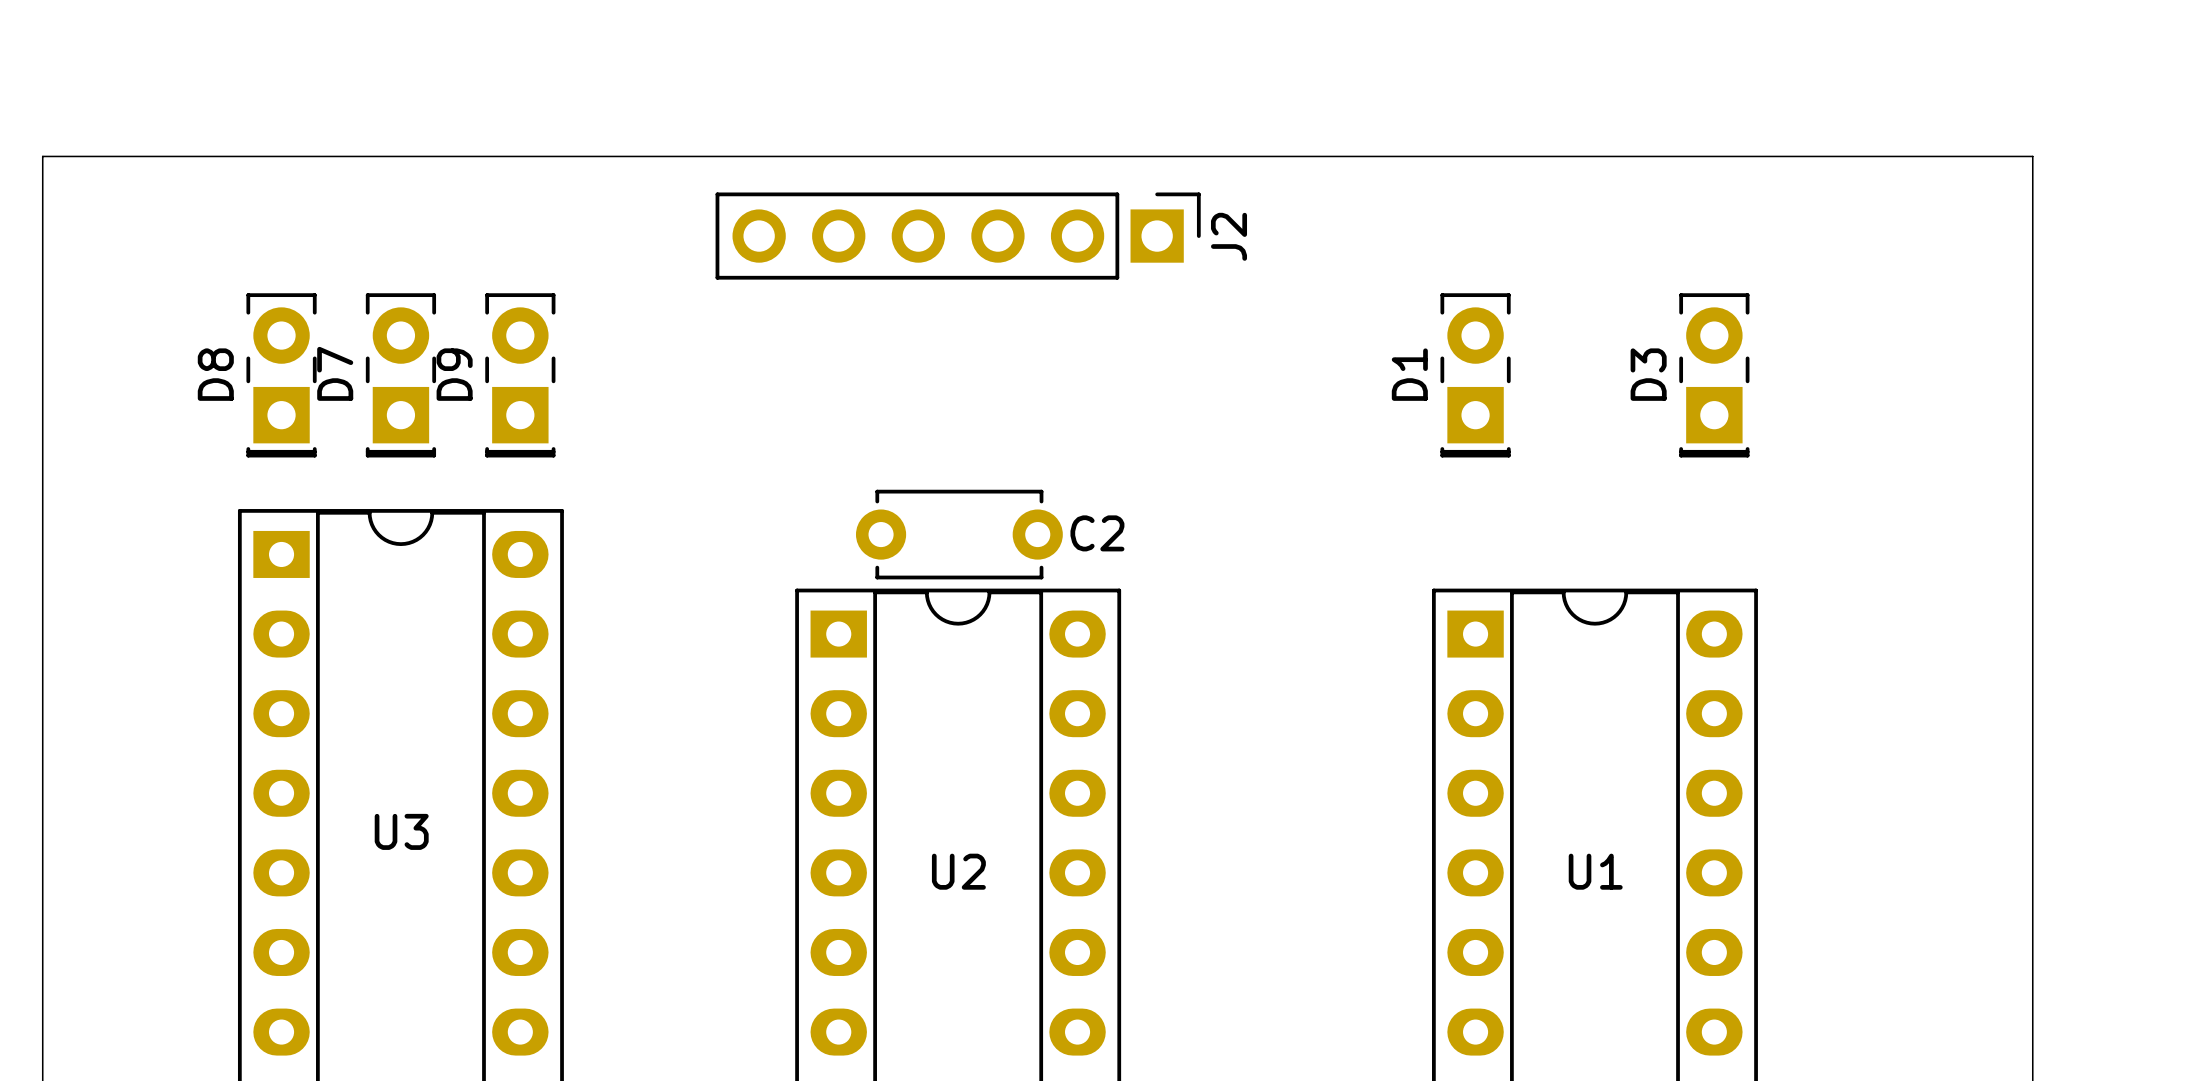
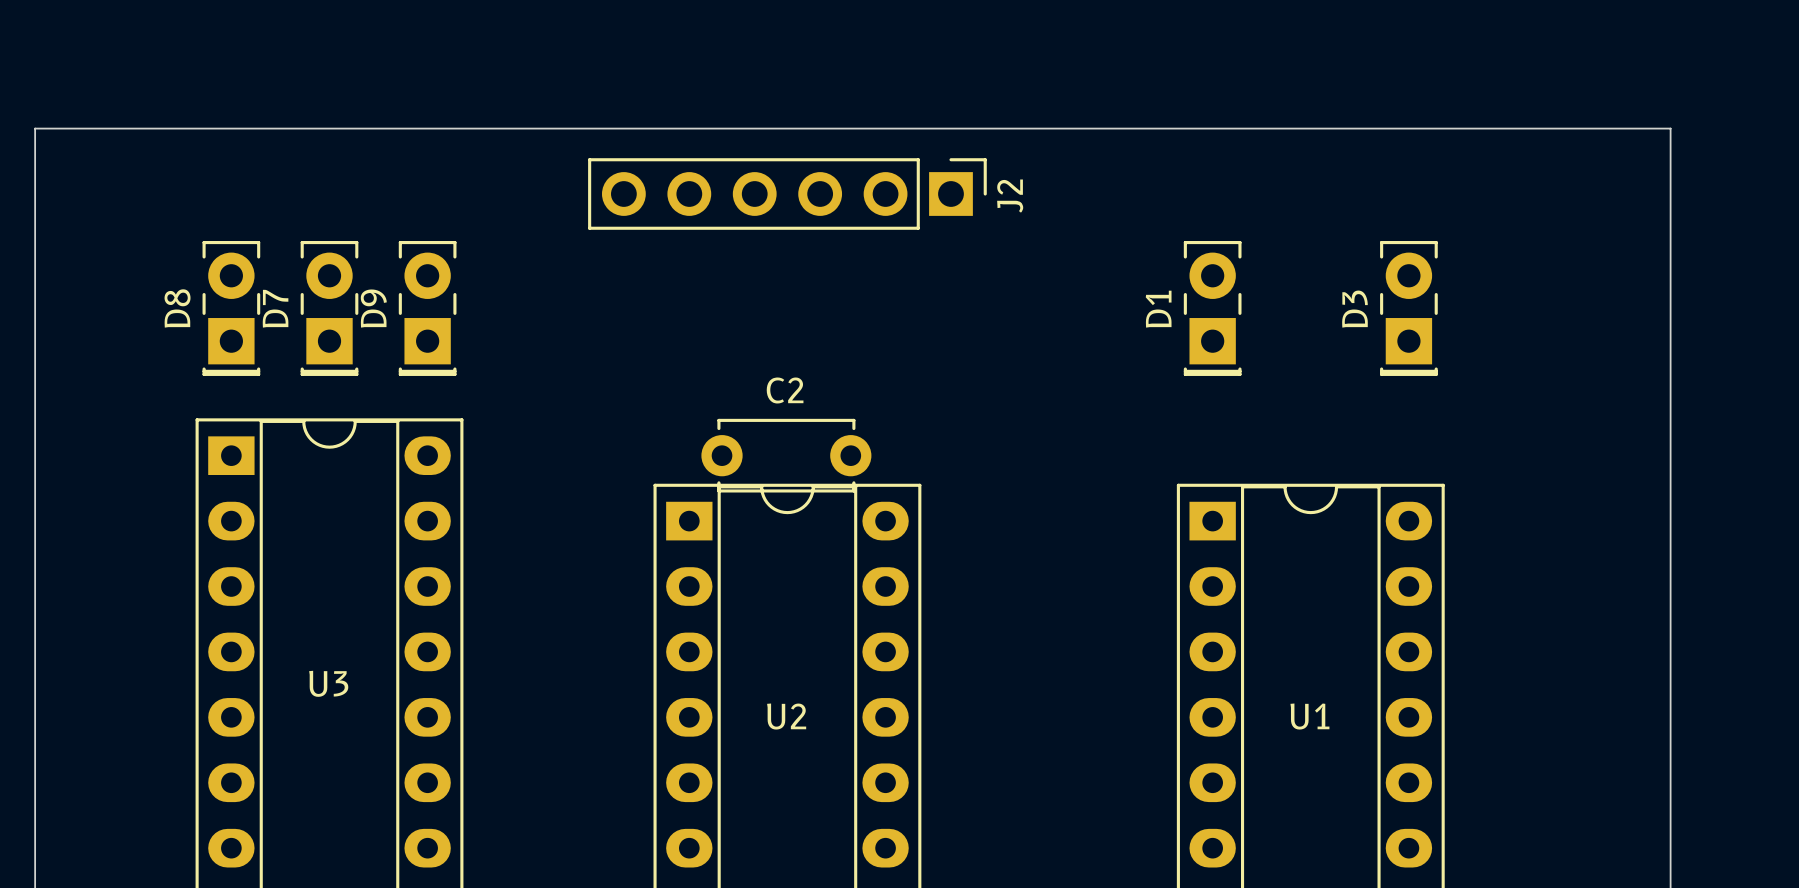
C2 name position: C2 (1097, 533) -> C2 (785, 390)
C2 position: (959, 534) -> (786, 455)

